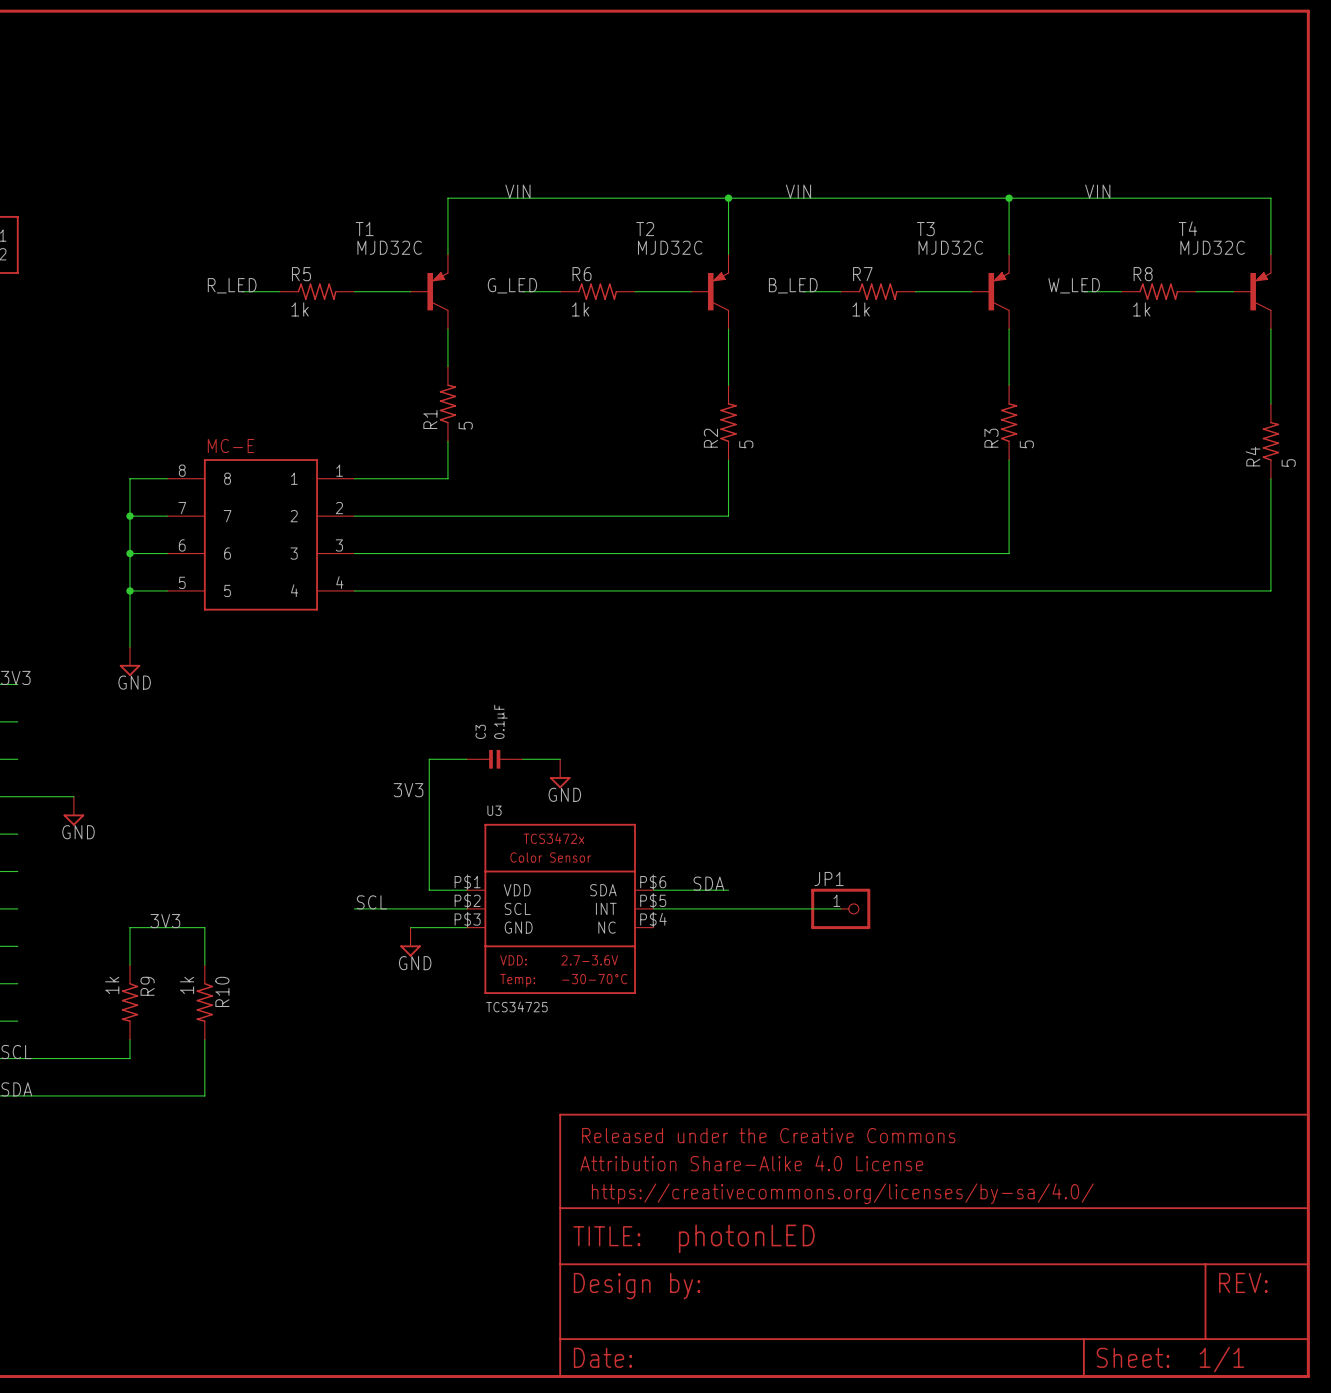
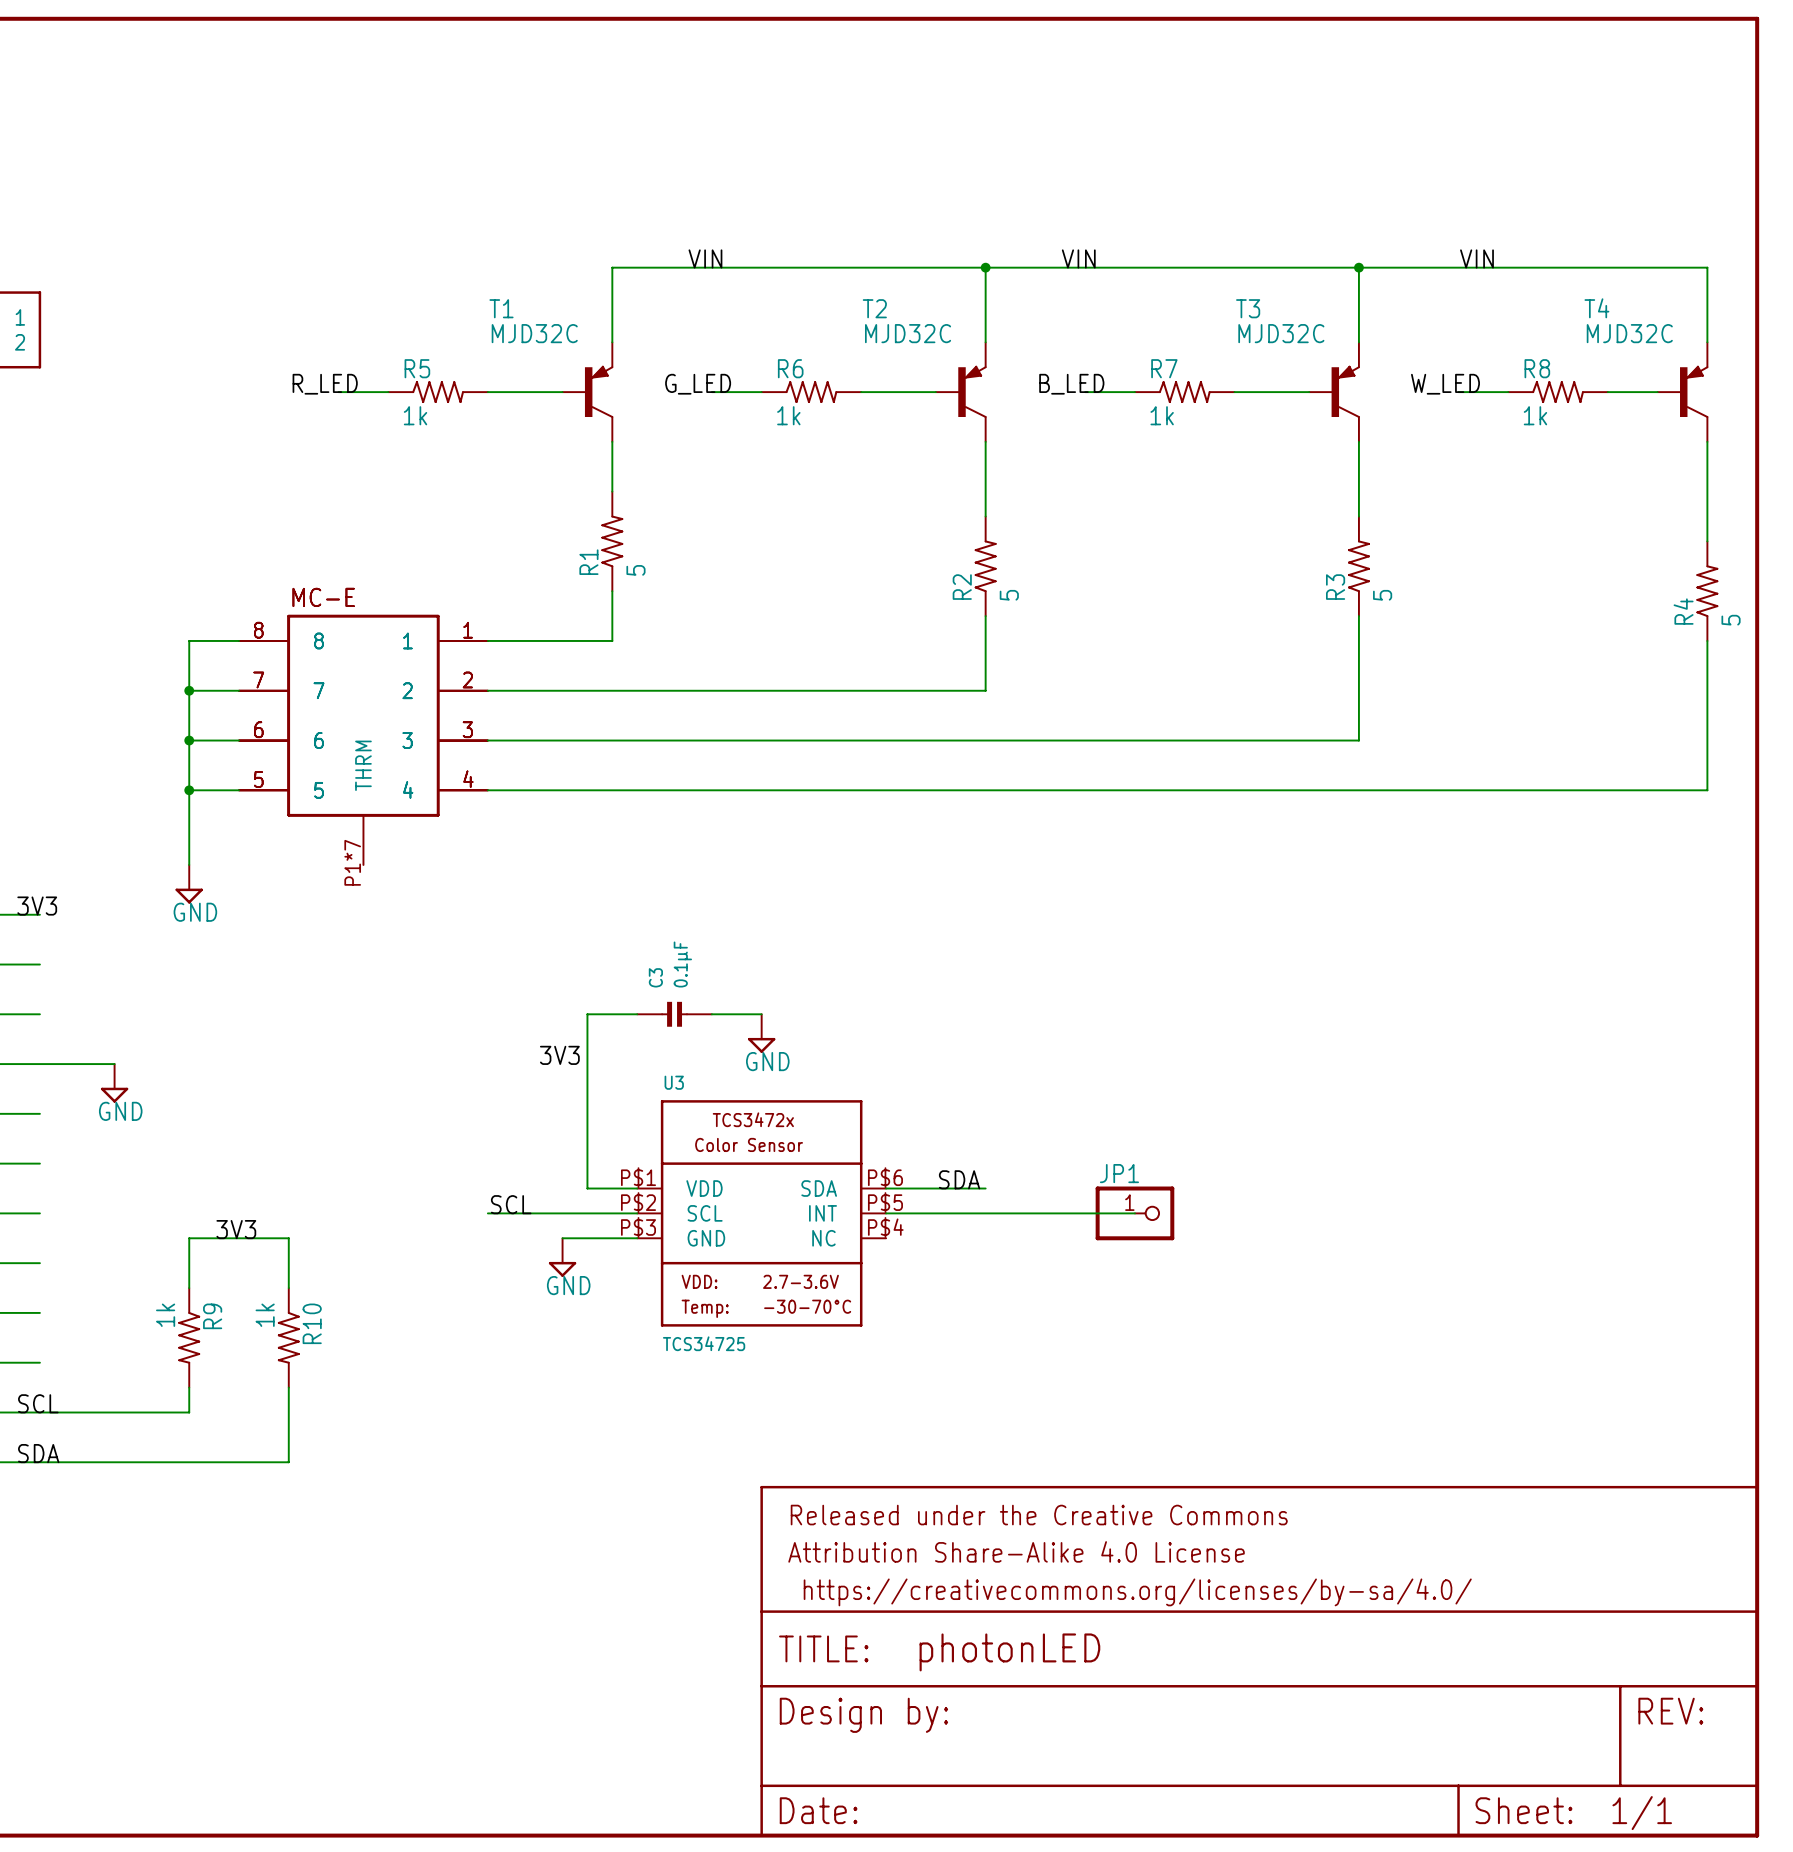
part: none -> (363, 739)

